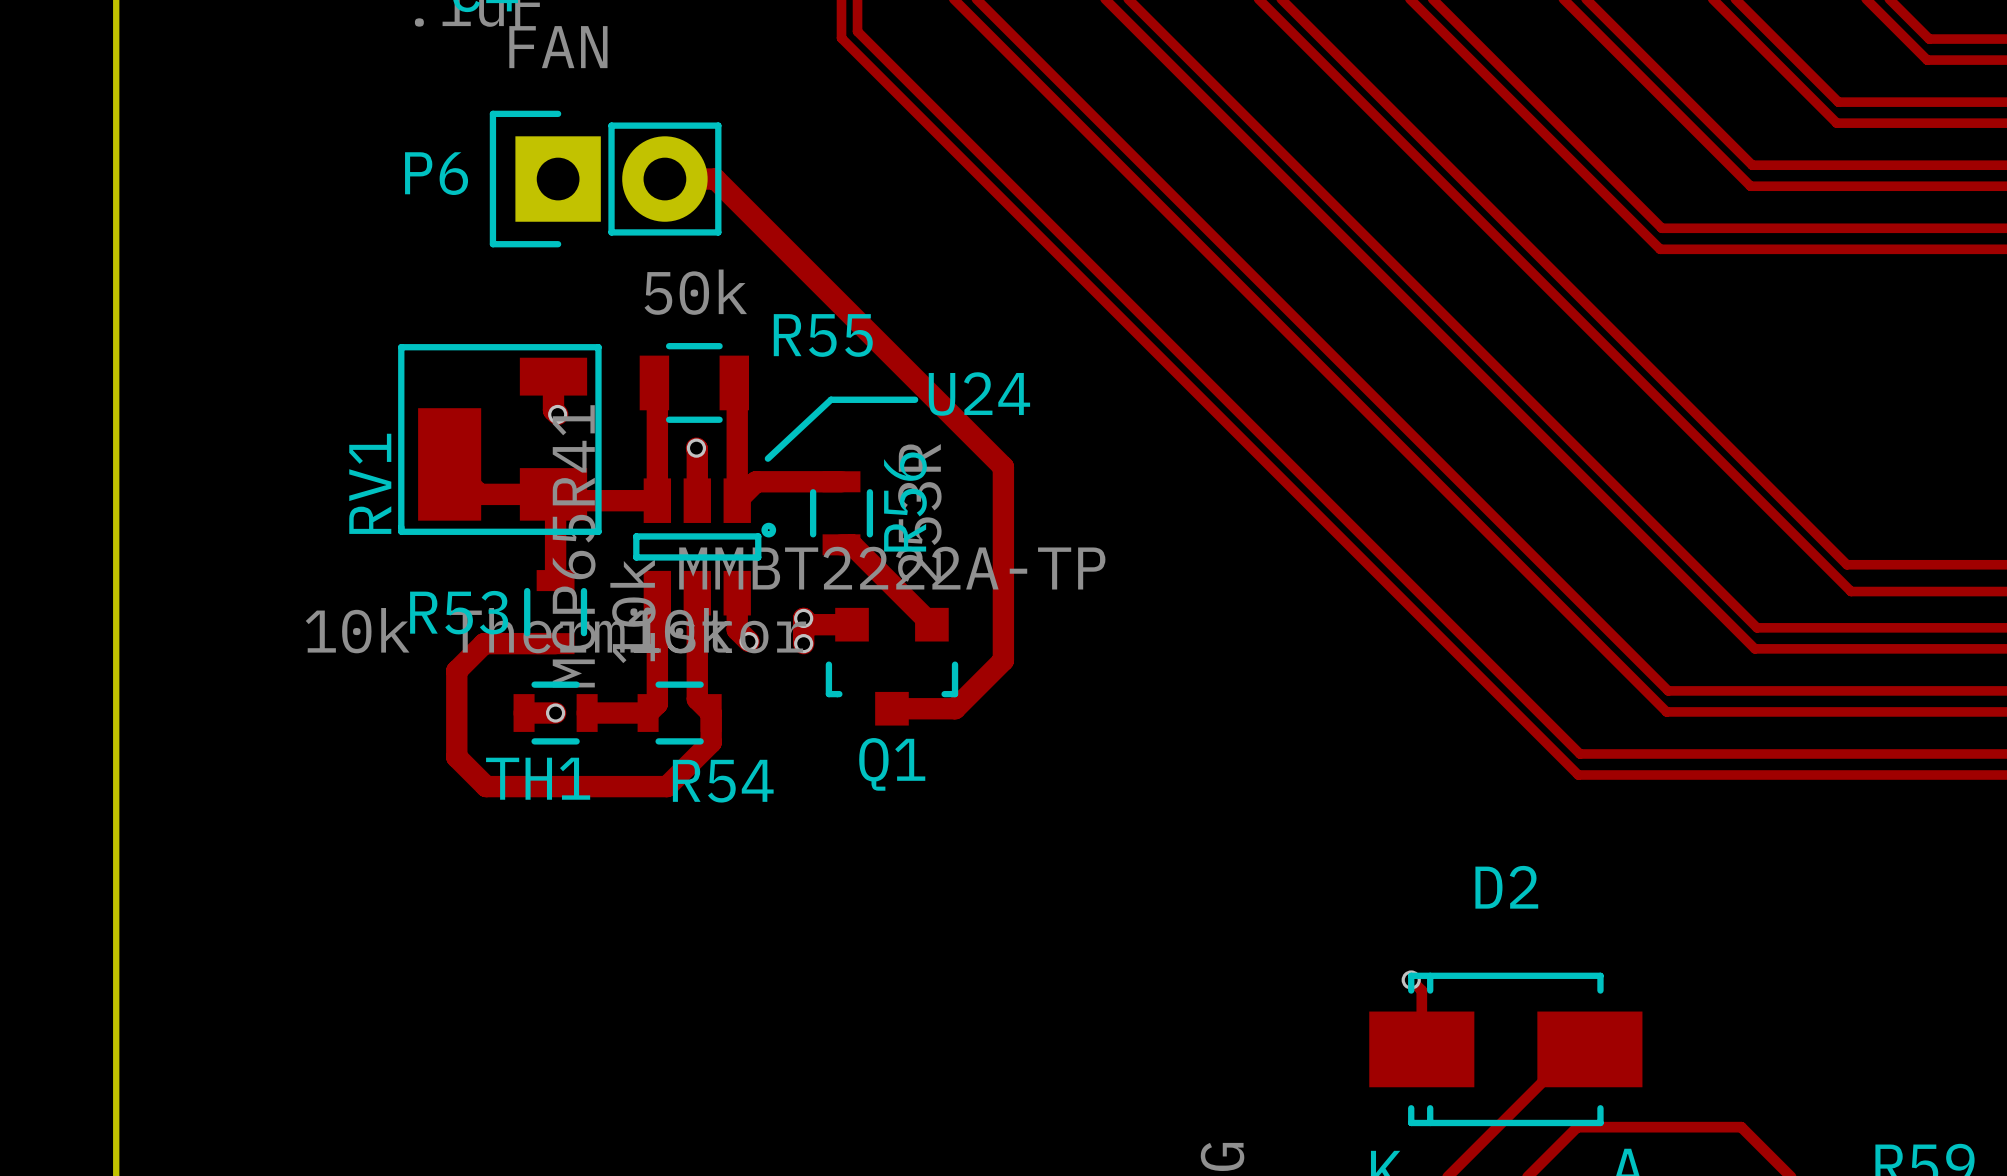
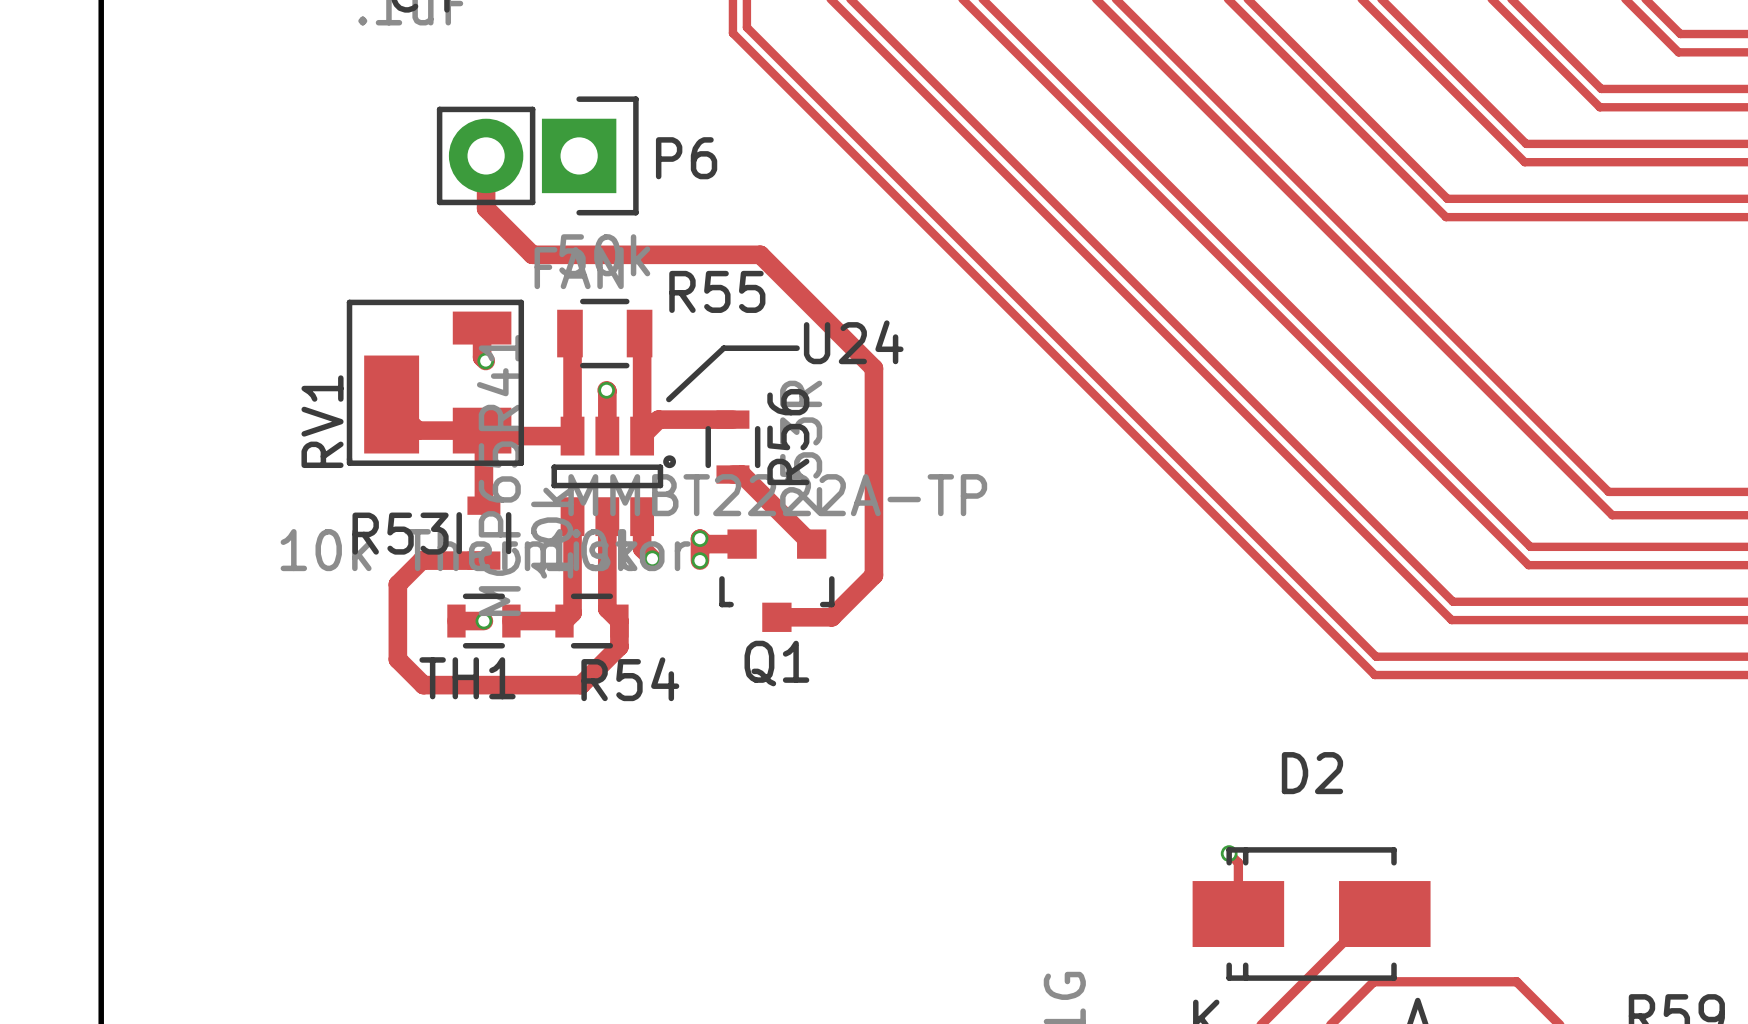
P6 rotation: 0° (605, 179) -> 180° (537, 155)
track: (664, 179) (715, 179) (1003, 467) -> (486, 155) (486, 208) (532, 254) (760, 254) (873, 368) (873, 406)

